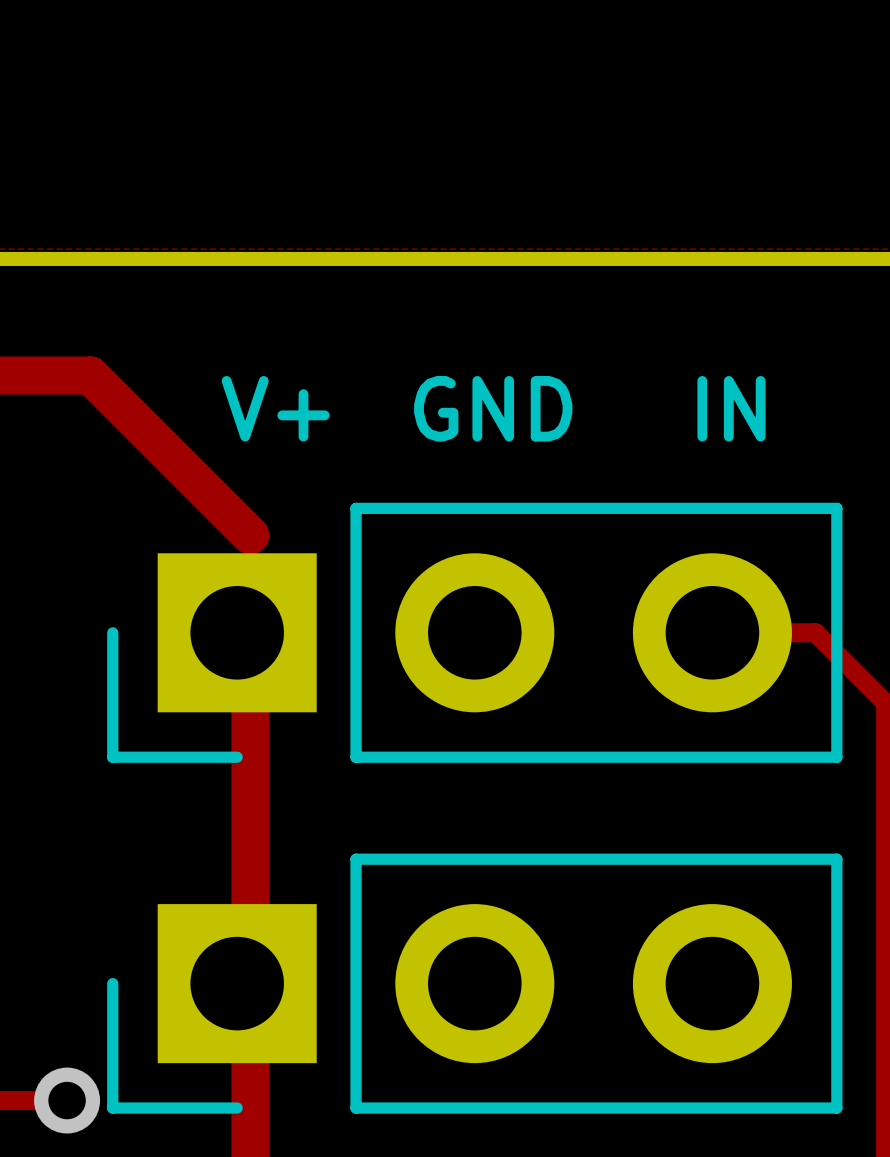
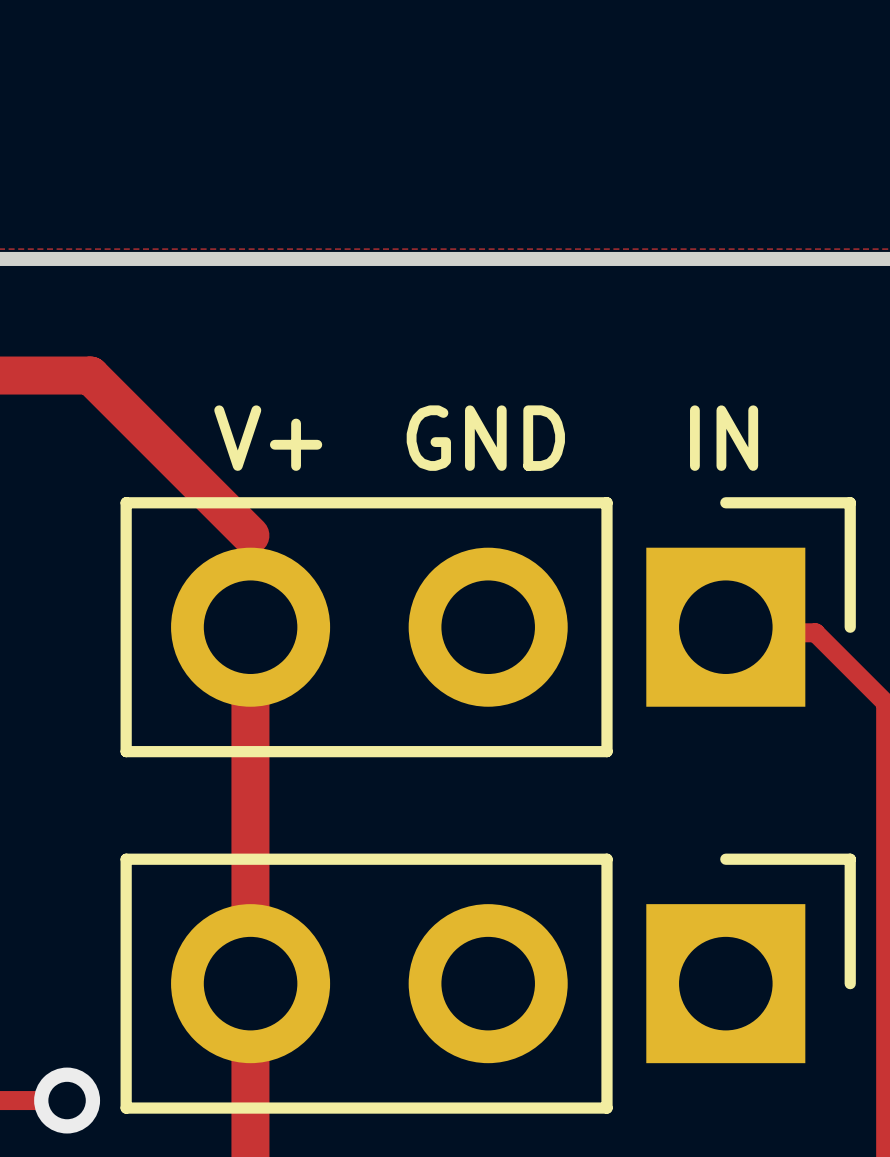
text position: V+ (275, 408) -> V+ (268, 438)
text position: GND (493, 408) -> GND (485, 438)
text position: IN (731, 408) -> IN (724, 438)
part rotation: 0° (474, 632) -> 180° (488, 627)
part rotation: 0° (474, 983) -> 180° (488, 983)

